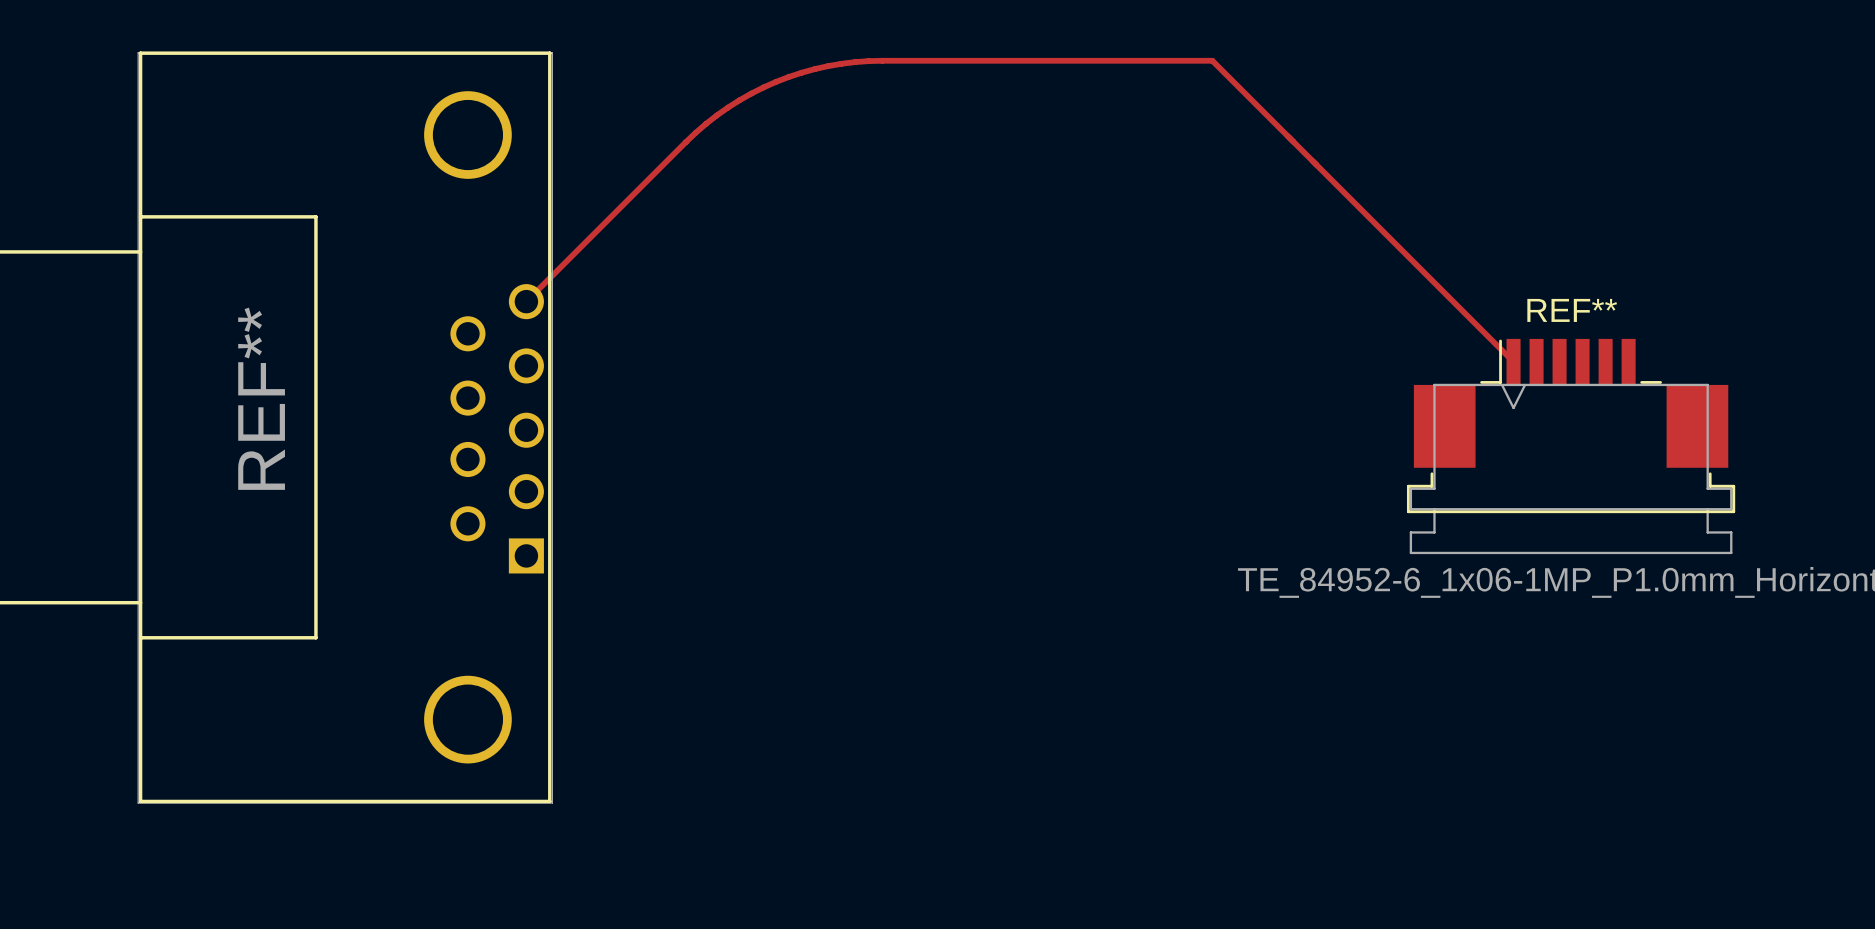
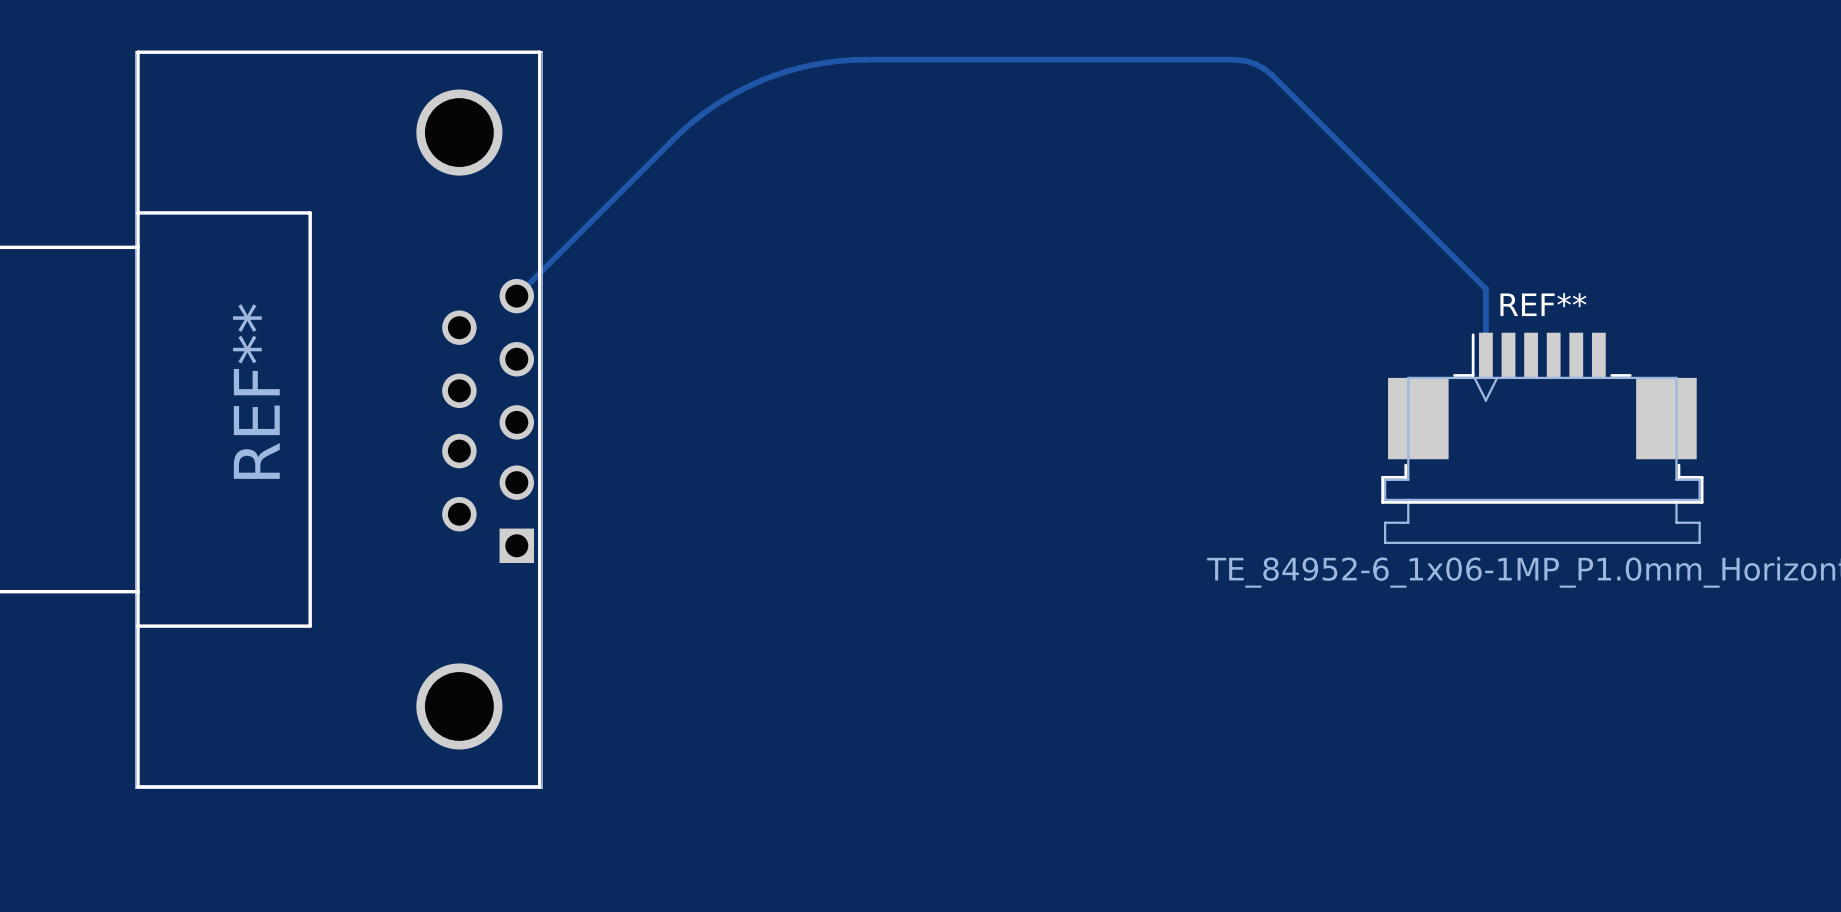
track: (1212, 60) (1513, 361) -> (1190, 59) (1244, 60) (1254, 63) (1272, 75) (1485, 288) (1485, 355)

